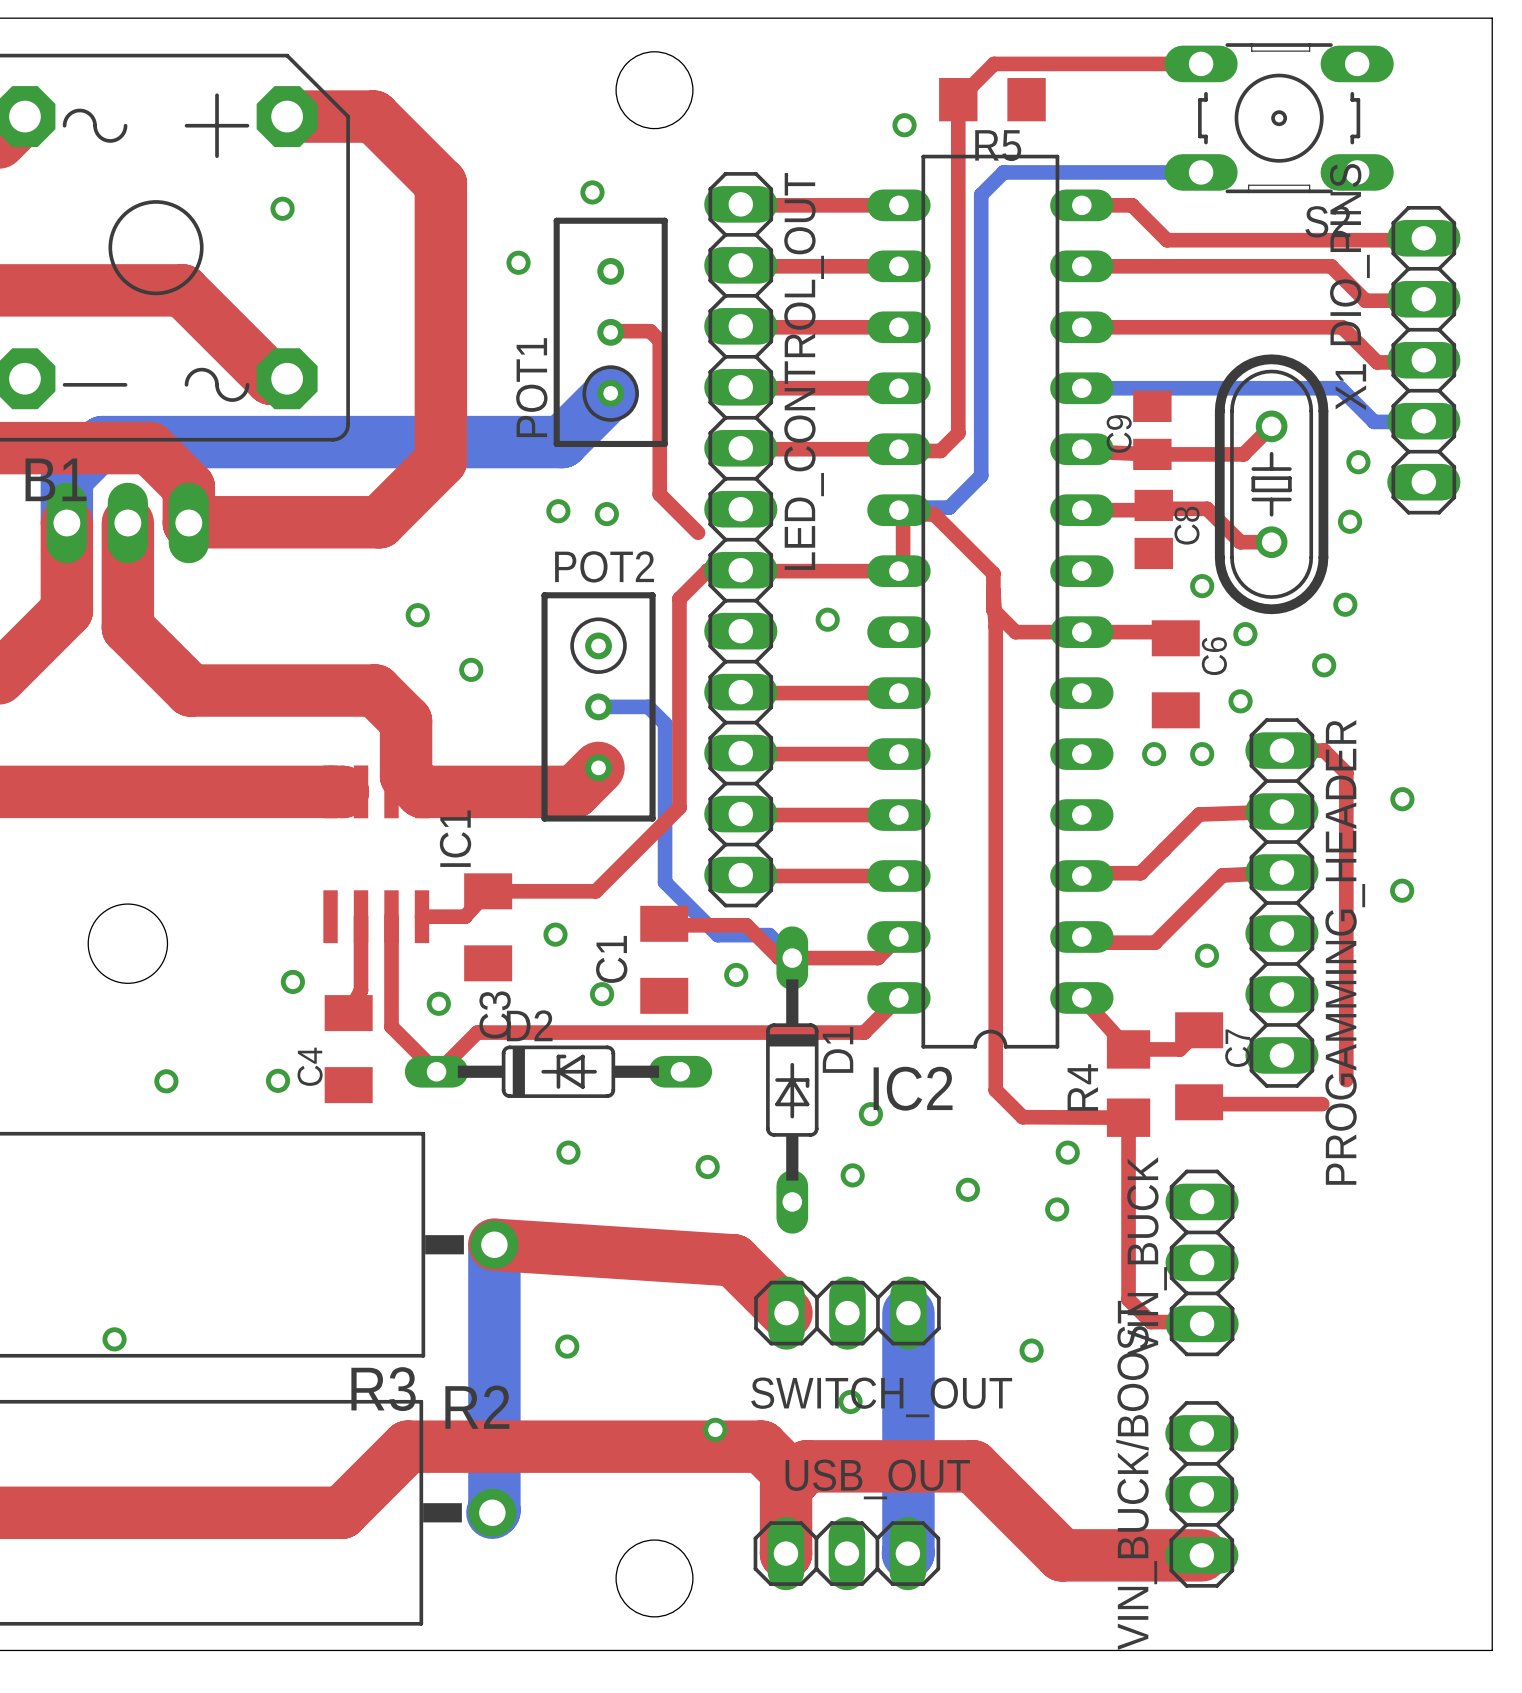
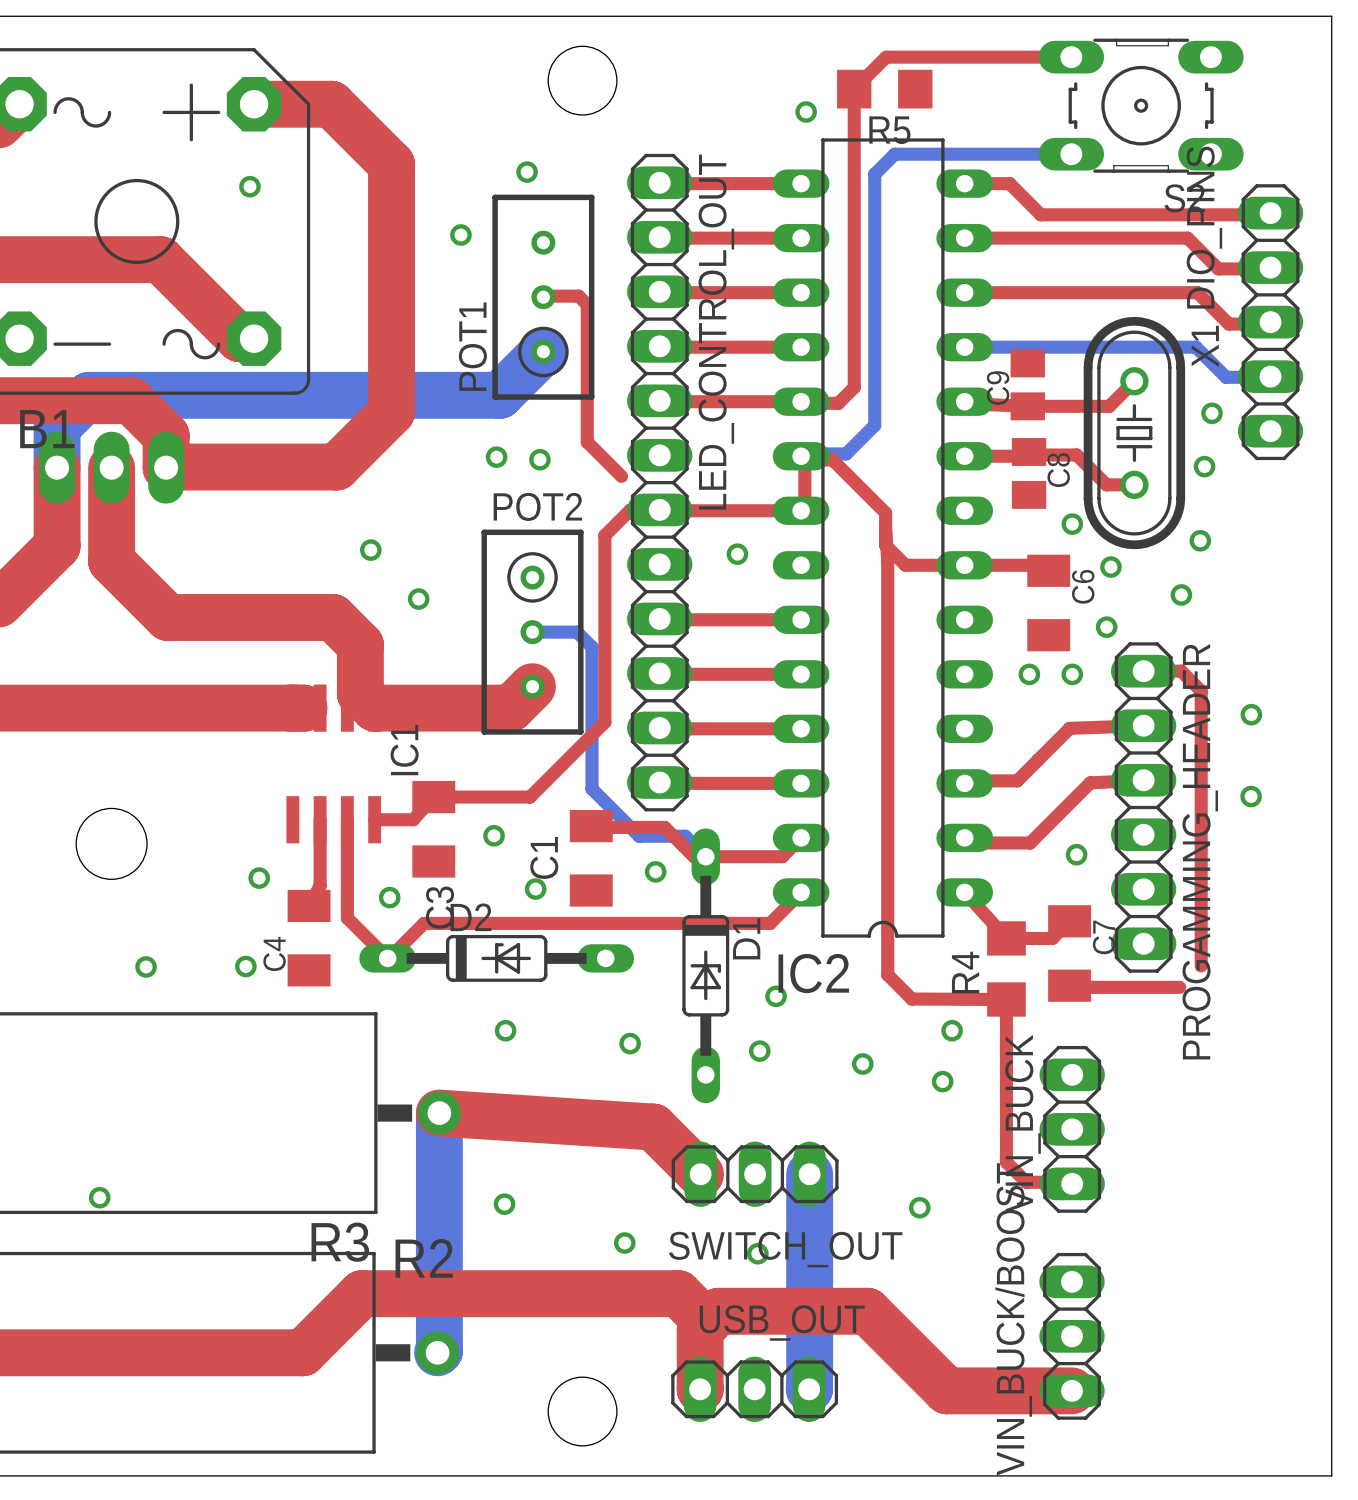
via position: (715, 1429) -> (624, 1243)

